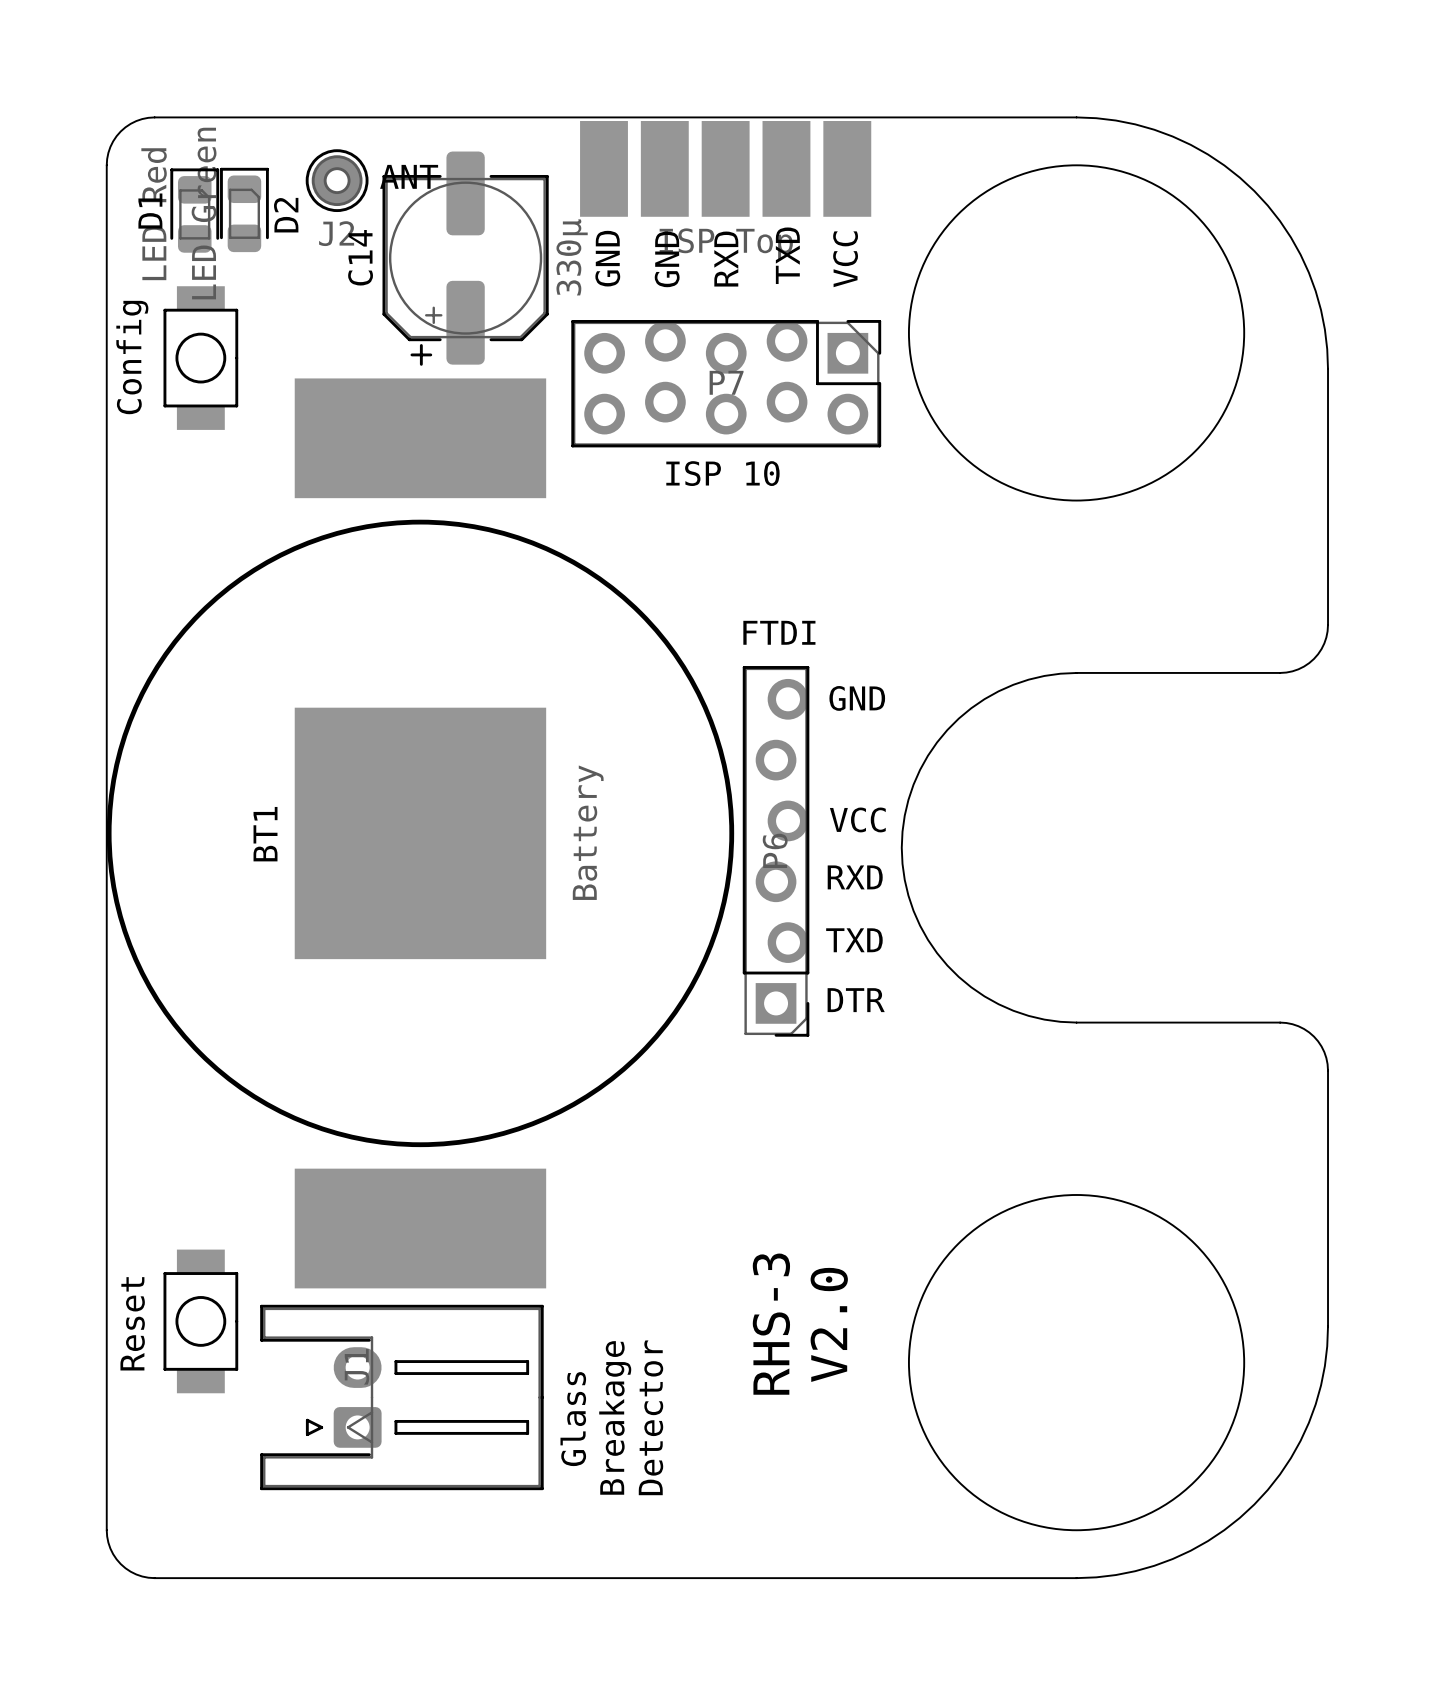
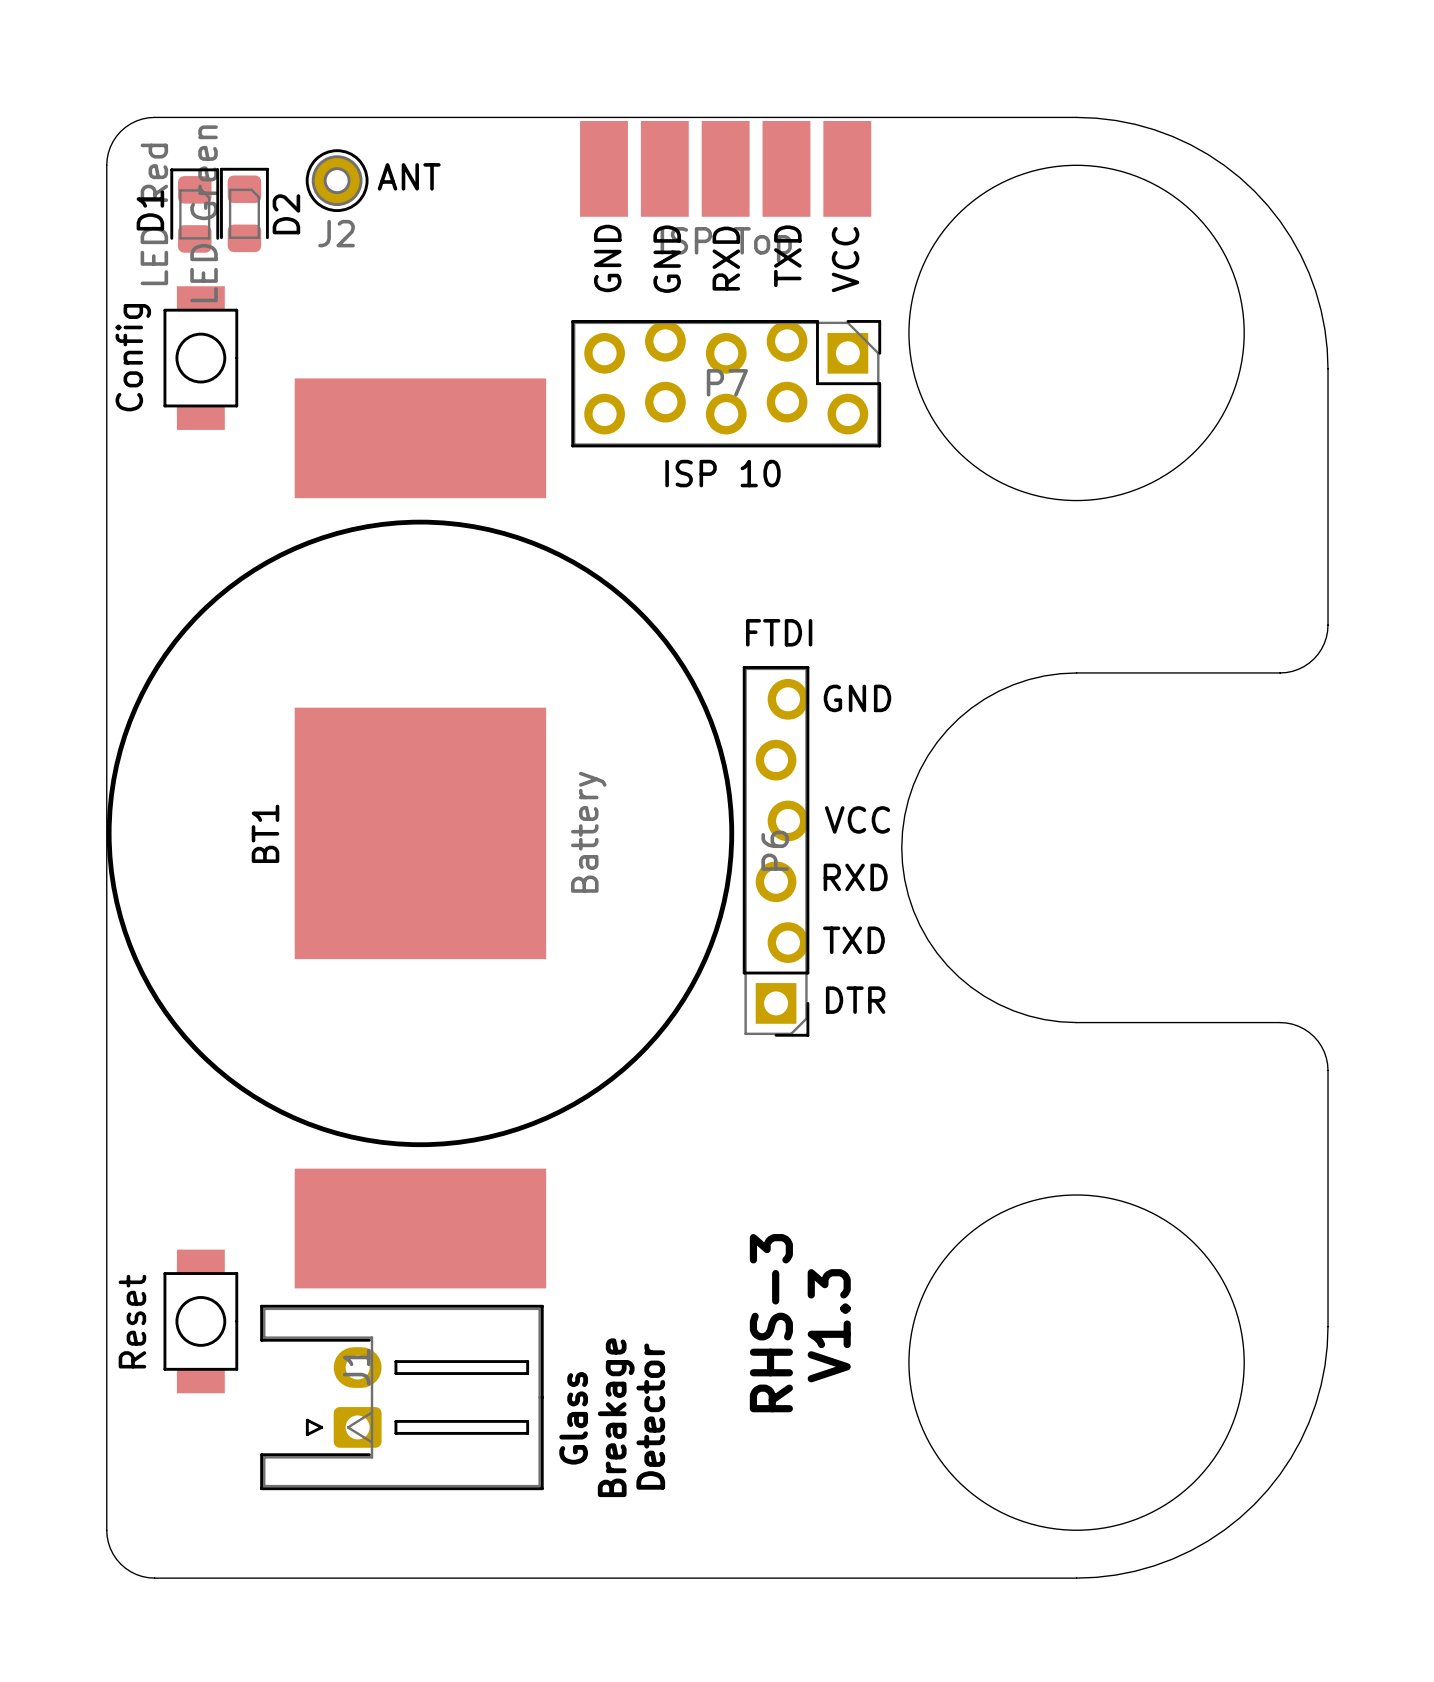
C14: 330µ (465, 258) -> none
text: V2.0 (829, 1324) -> V1.3 (829, 1325)

